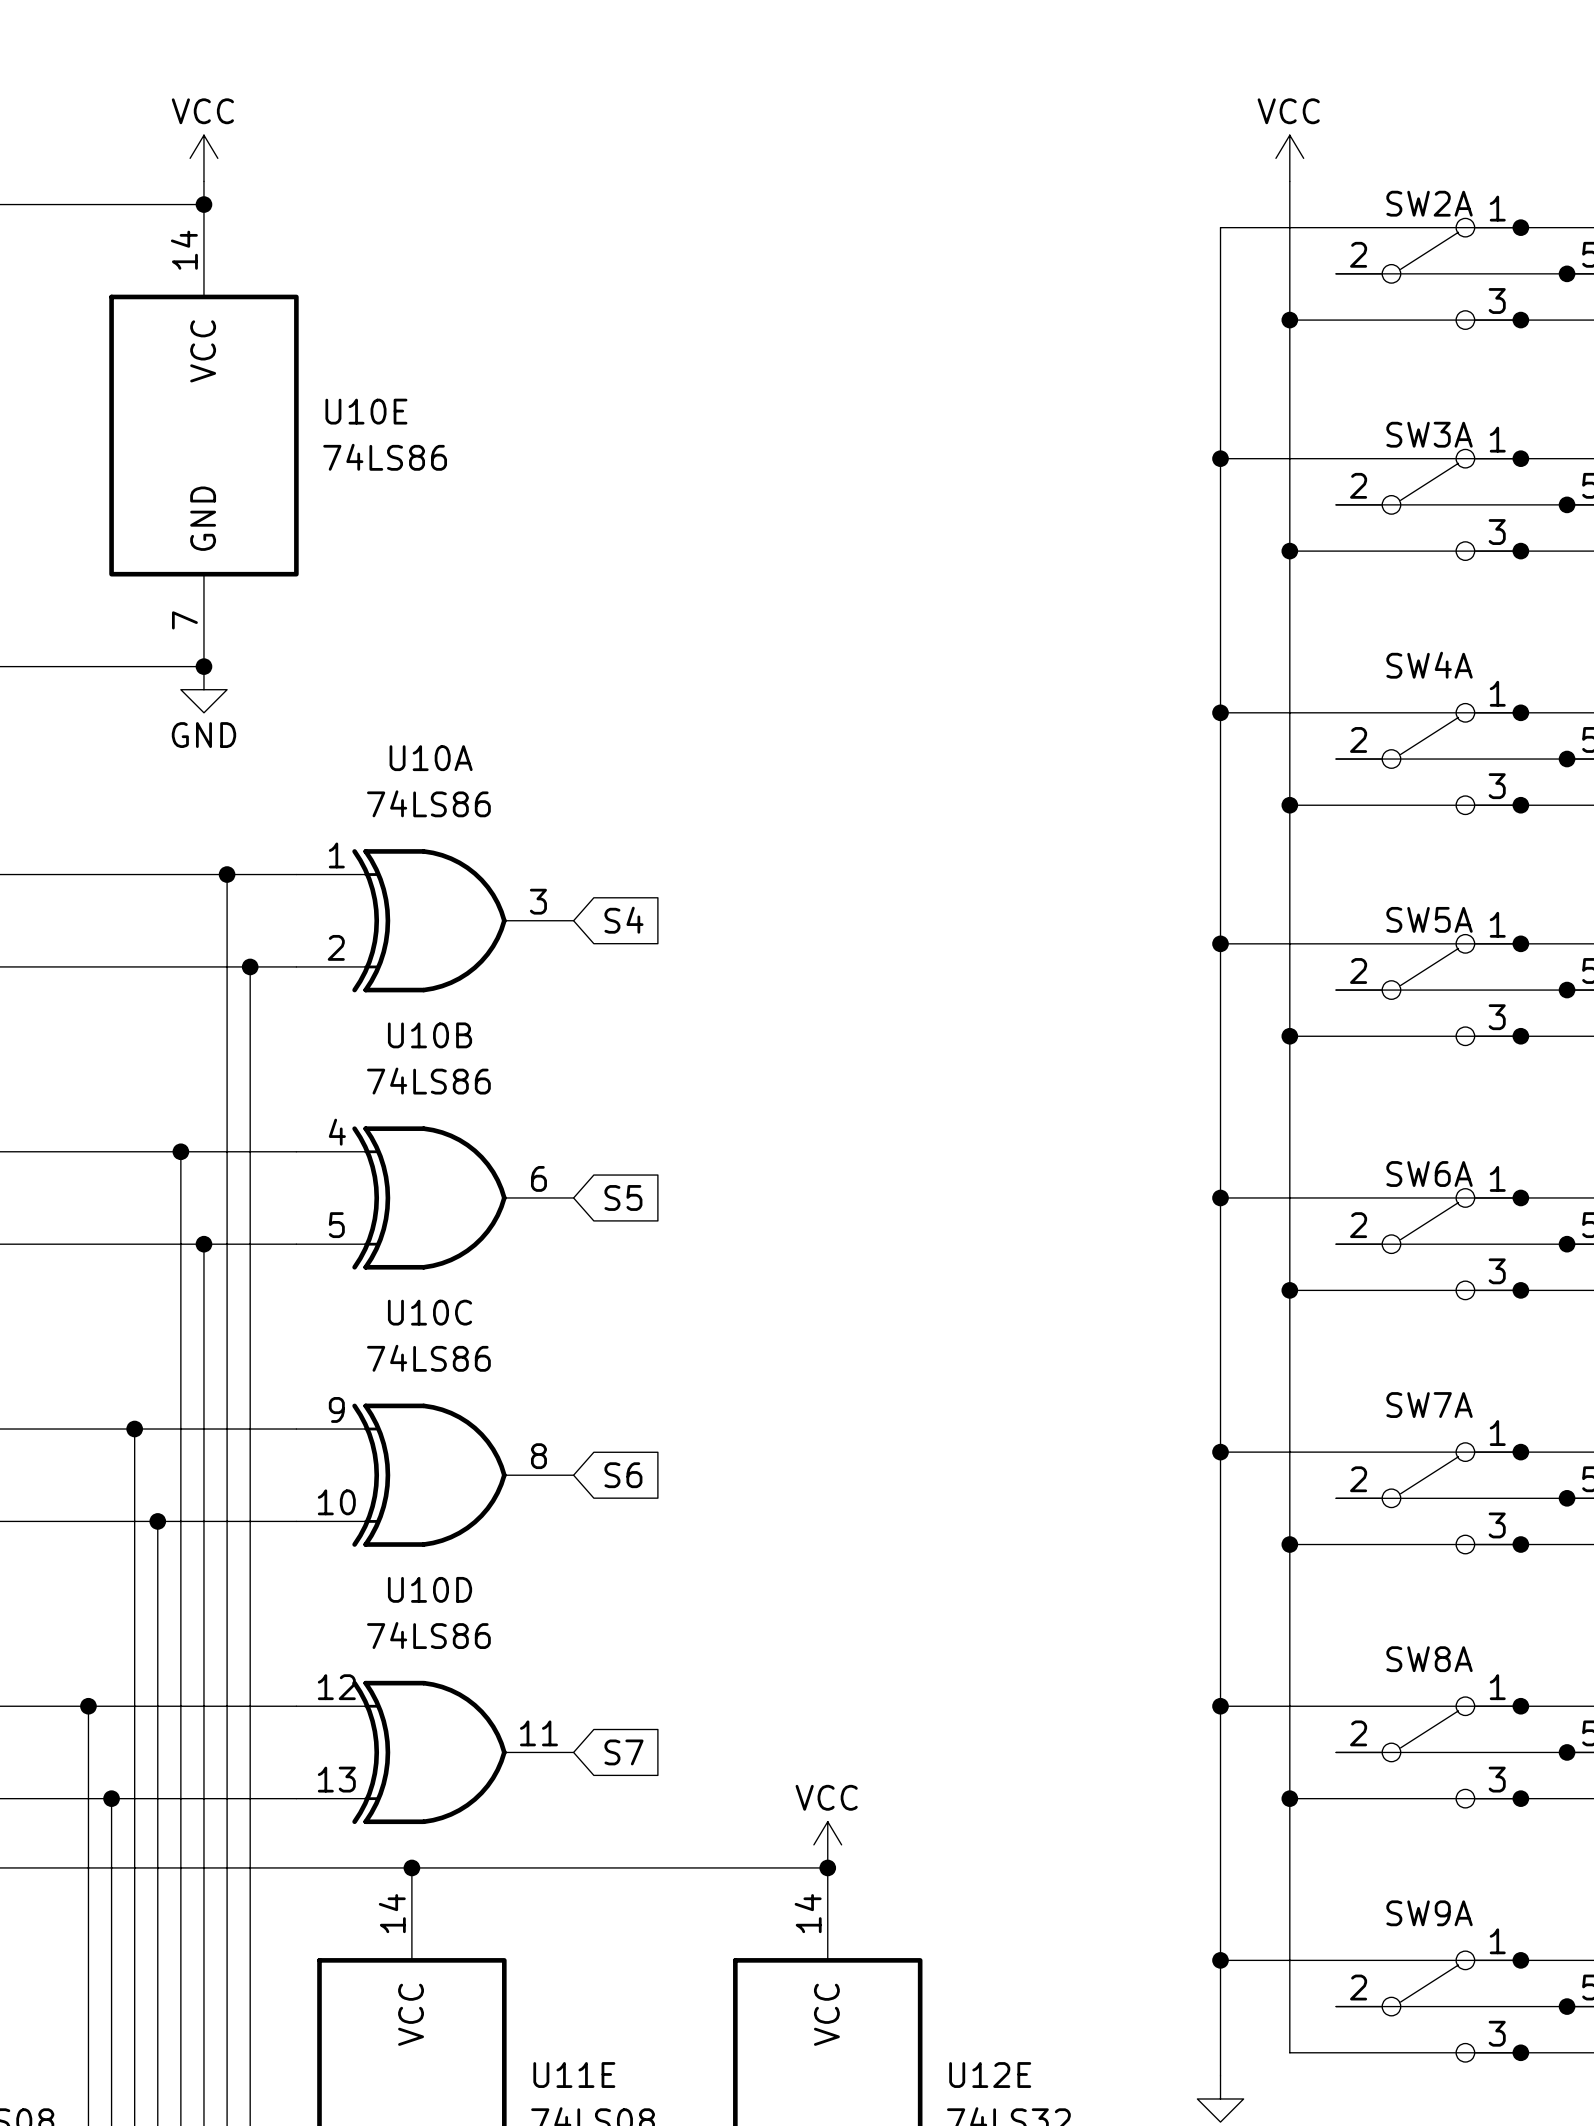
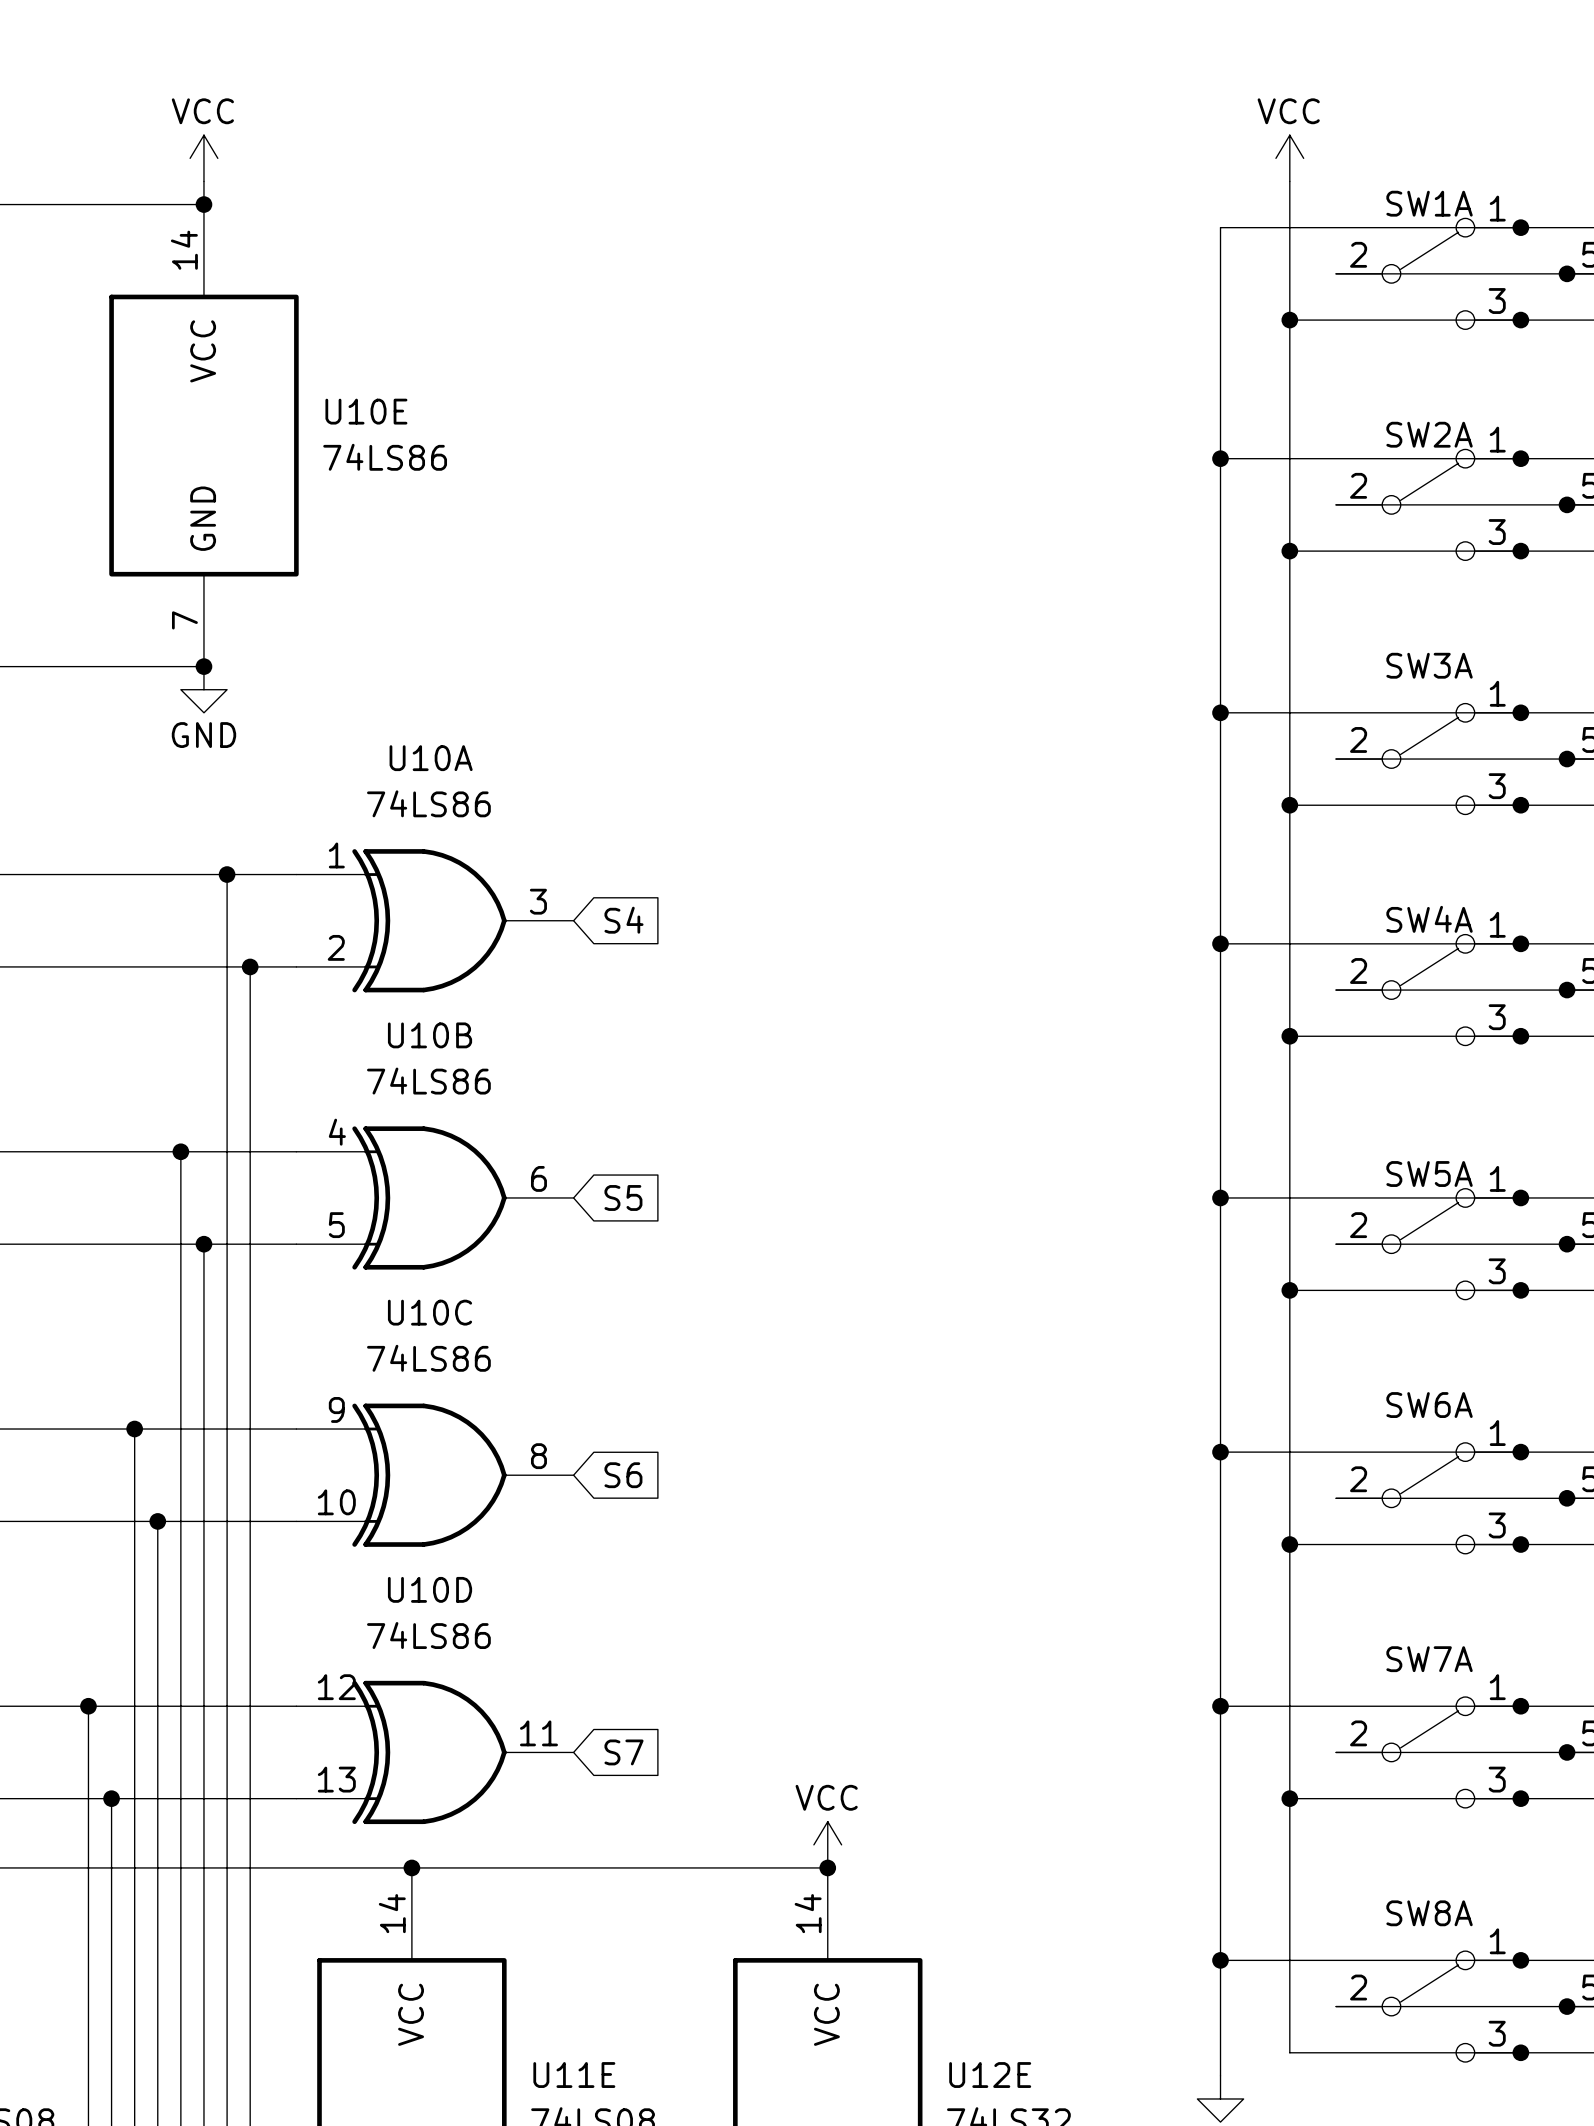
SW2A name: SW2A (1429, 203) -> SW1A (1429, 203)
SW3A name: SW3A (1429, 434) -> SW2A (1429, 434)
SW4A name: SW4A (1429, 665) -> SW3A (1429, 665)
SW5A name: SW5A (1429, 919) -> SW4A (1429, 919)
SW6A name: SW6A (1429, 1174) -> SW5A (1429, 1174)
SW7A name: SW7A (1429, 1405) -> SW6A (1429, 1405)
SW8A name: SW8A (1429, 1659) -> SW7A (1429, 1659)
SW9A name: SW9A (1429, 1913) -> SW8A (1429, 1913)

